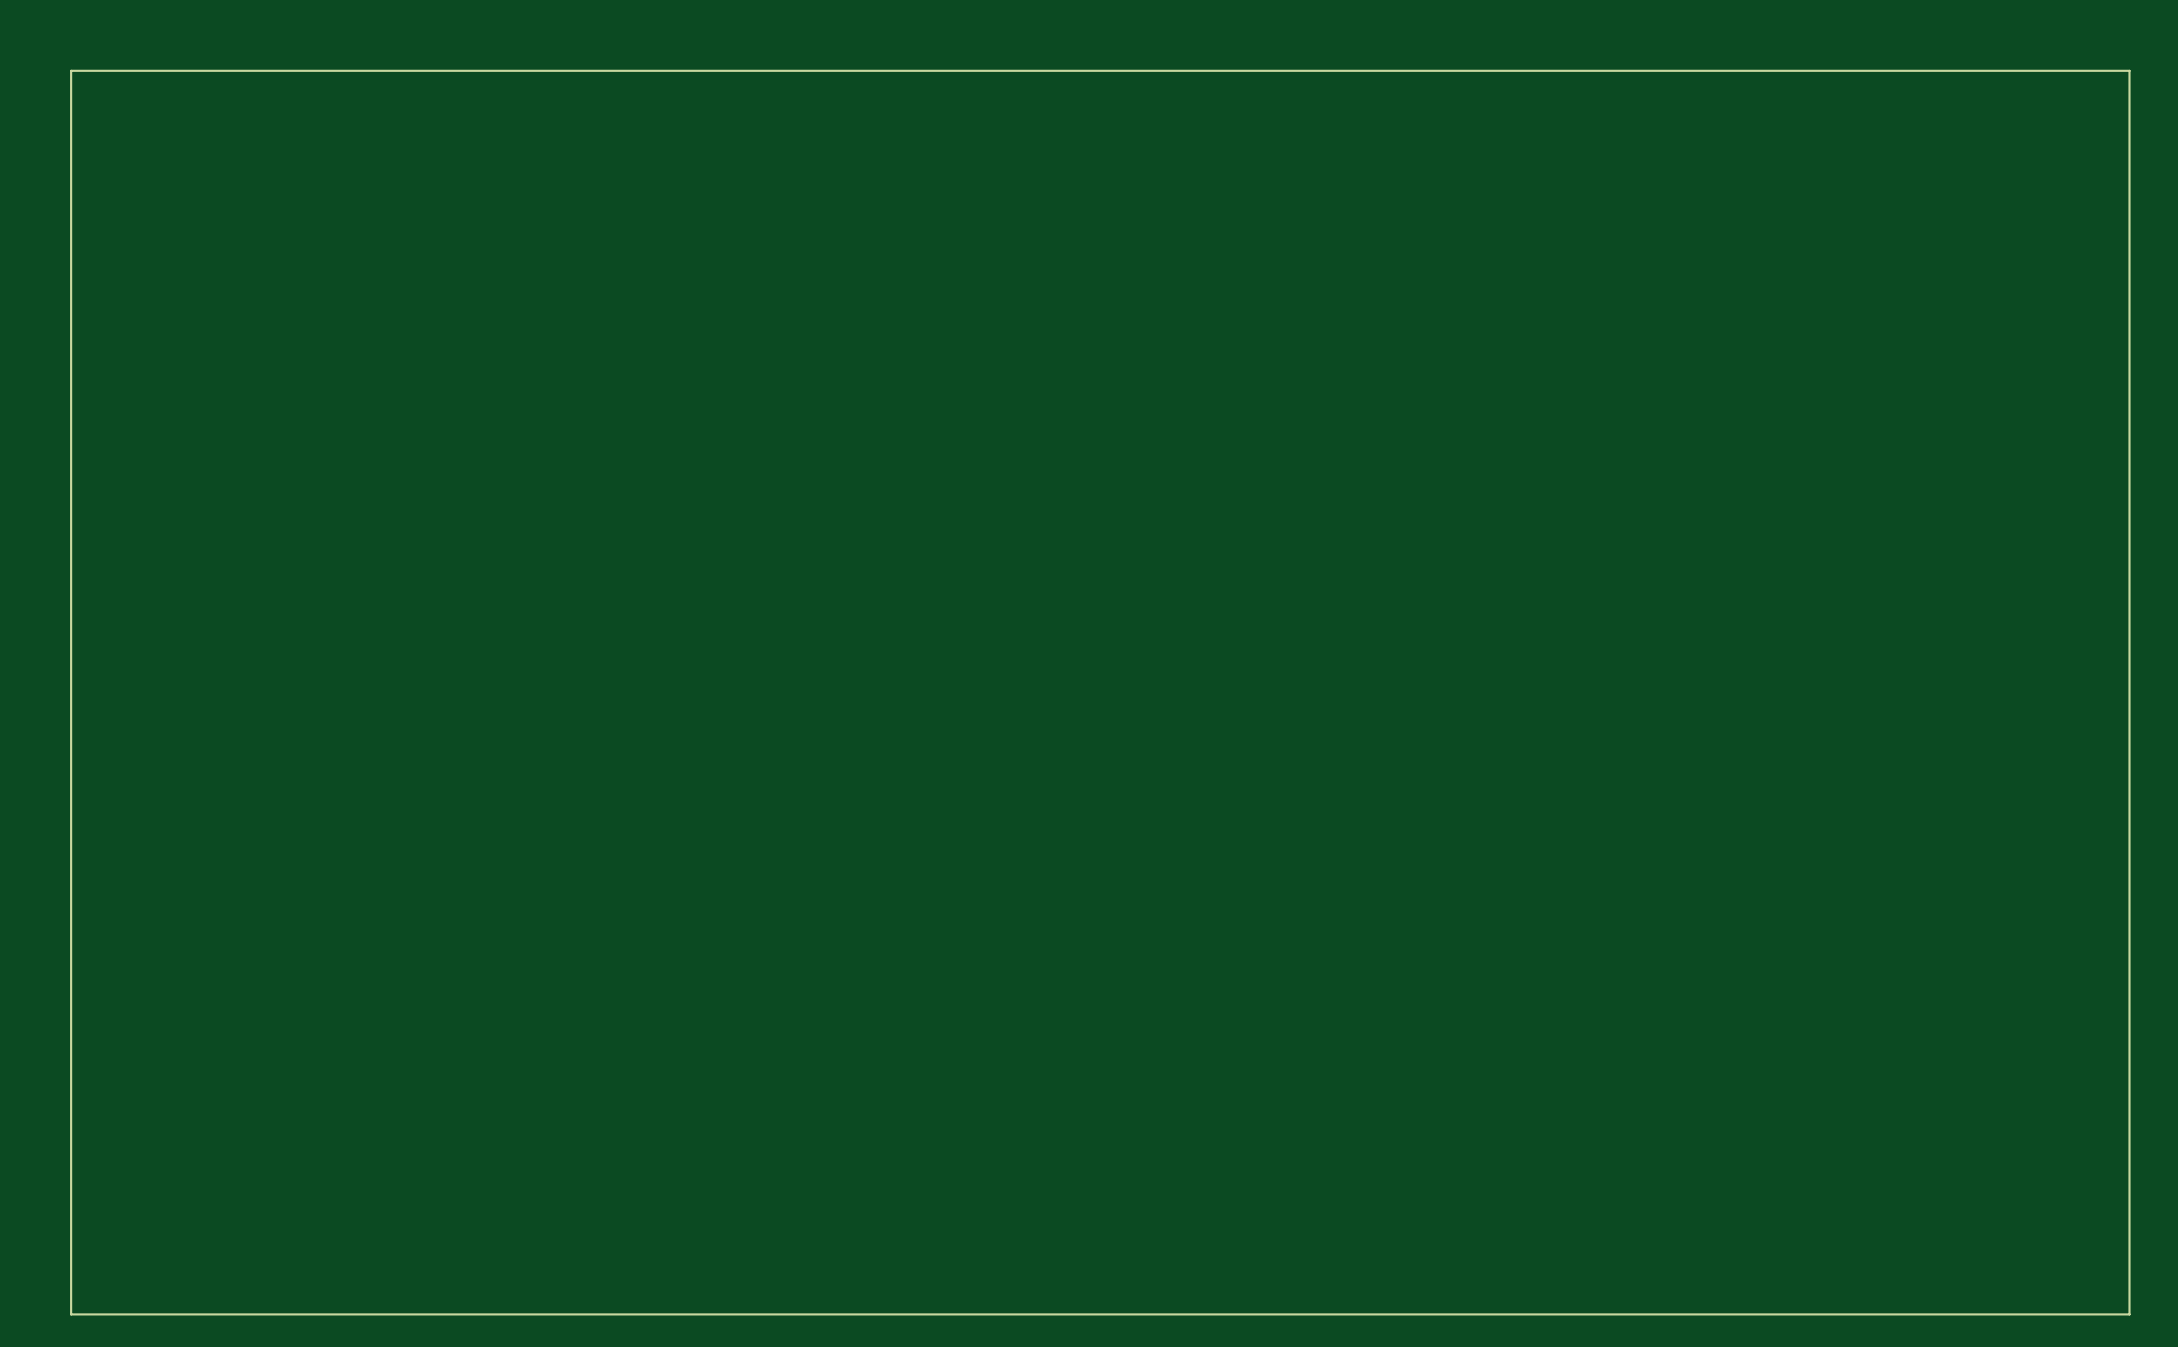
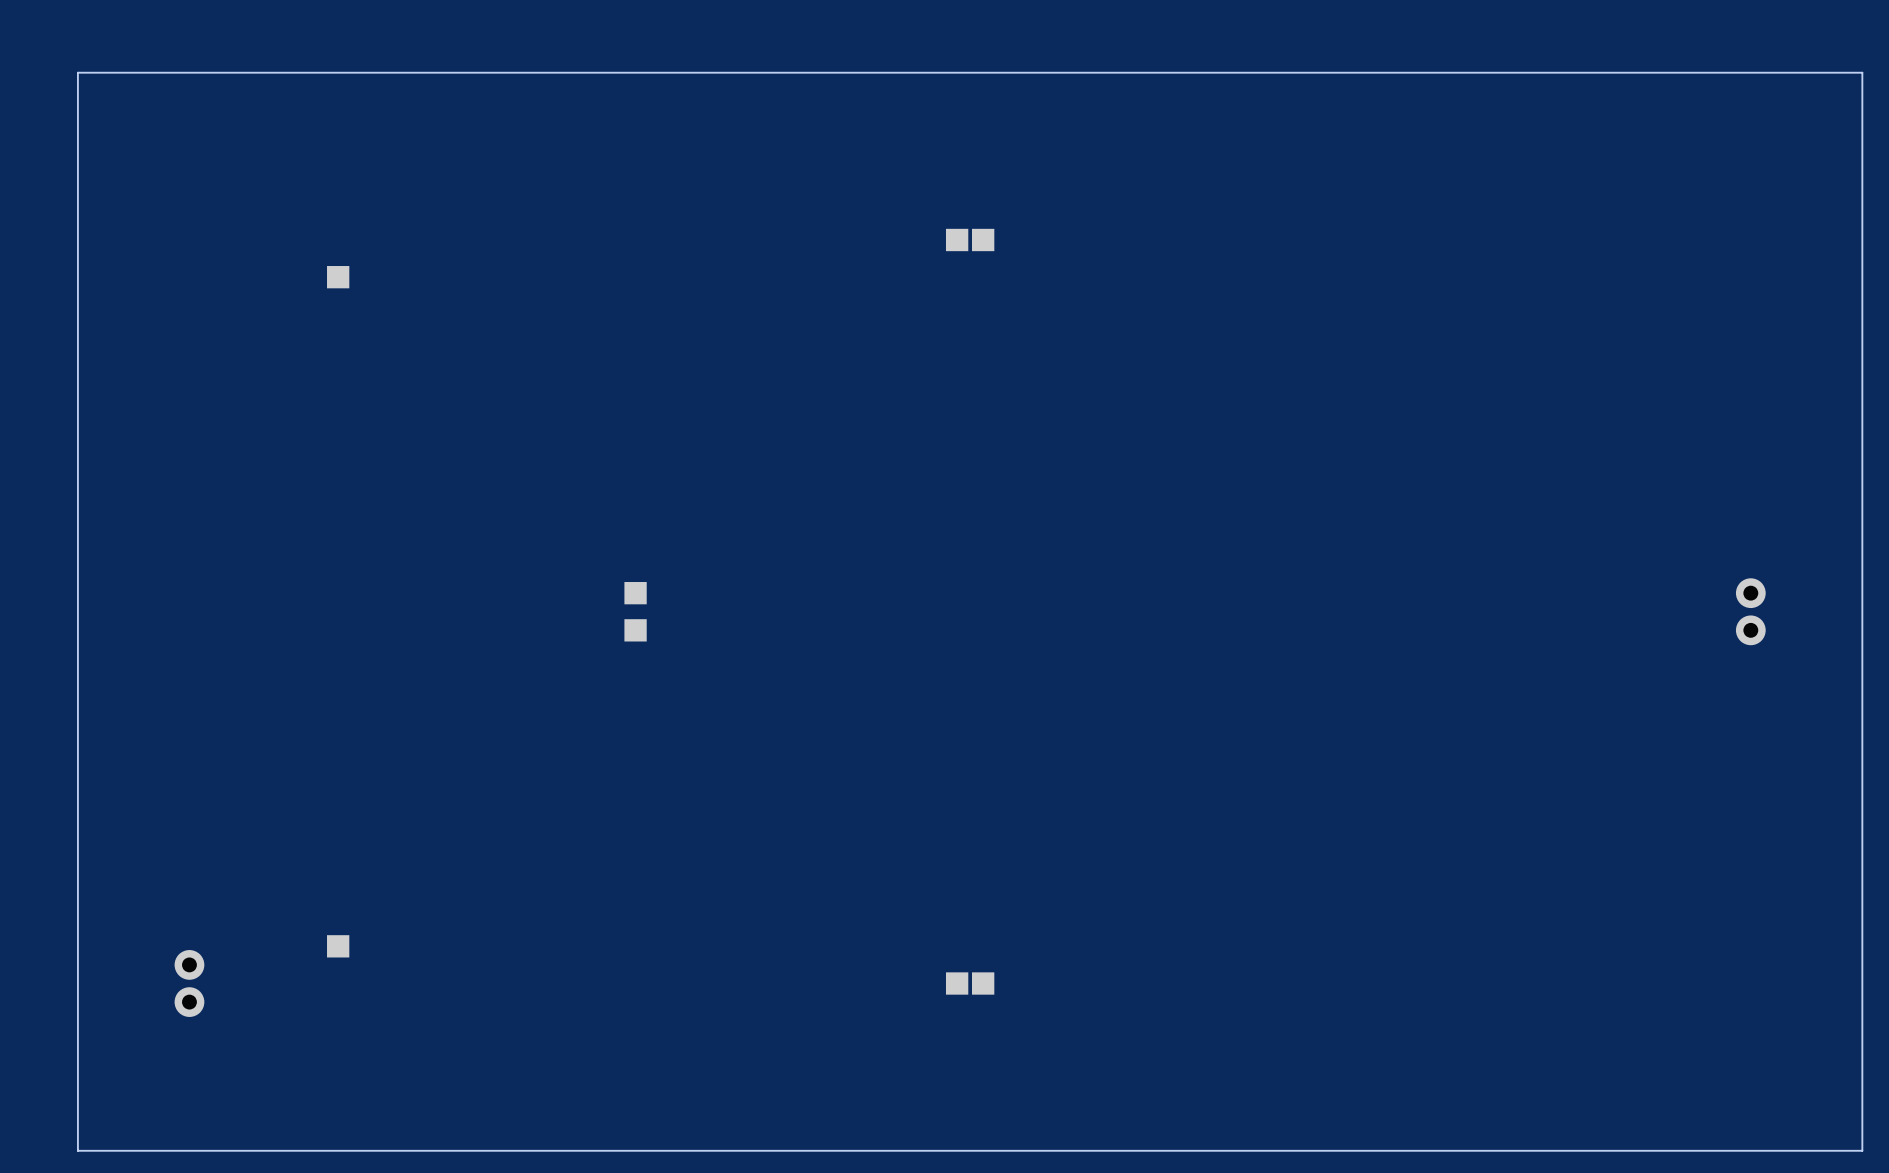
part: none -> (970, 240)
part: none -> (338, 277)
part: none -> (635, 611)
part: none -> (1750, 611)
part: none -> (338, 946)
part: none -> (189, 983)
part: none -> (970, 983)

